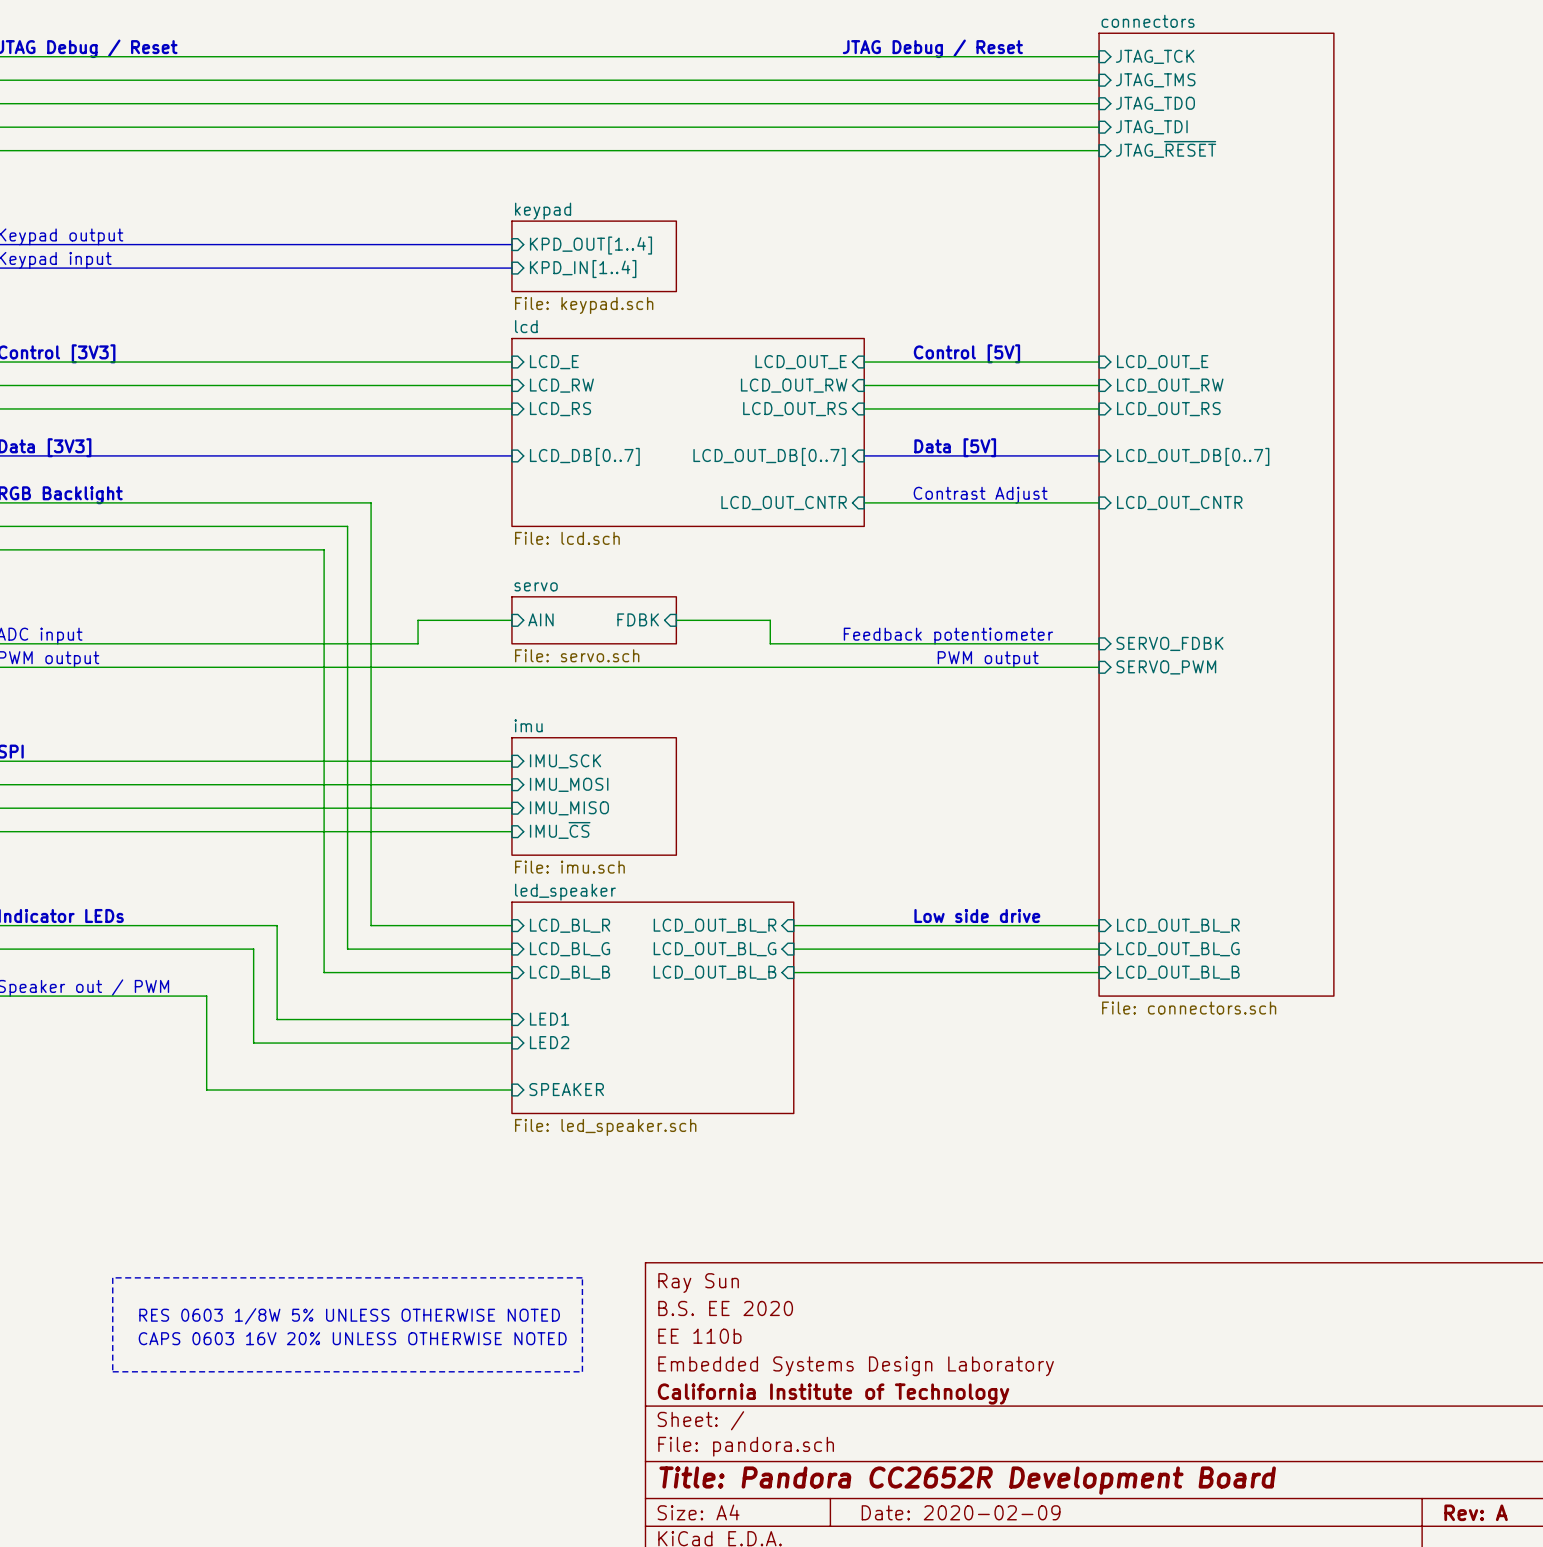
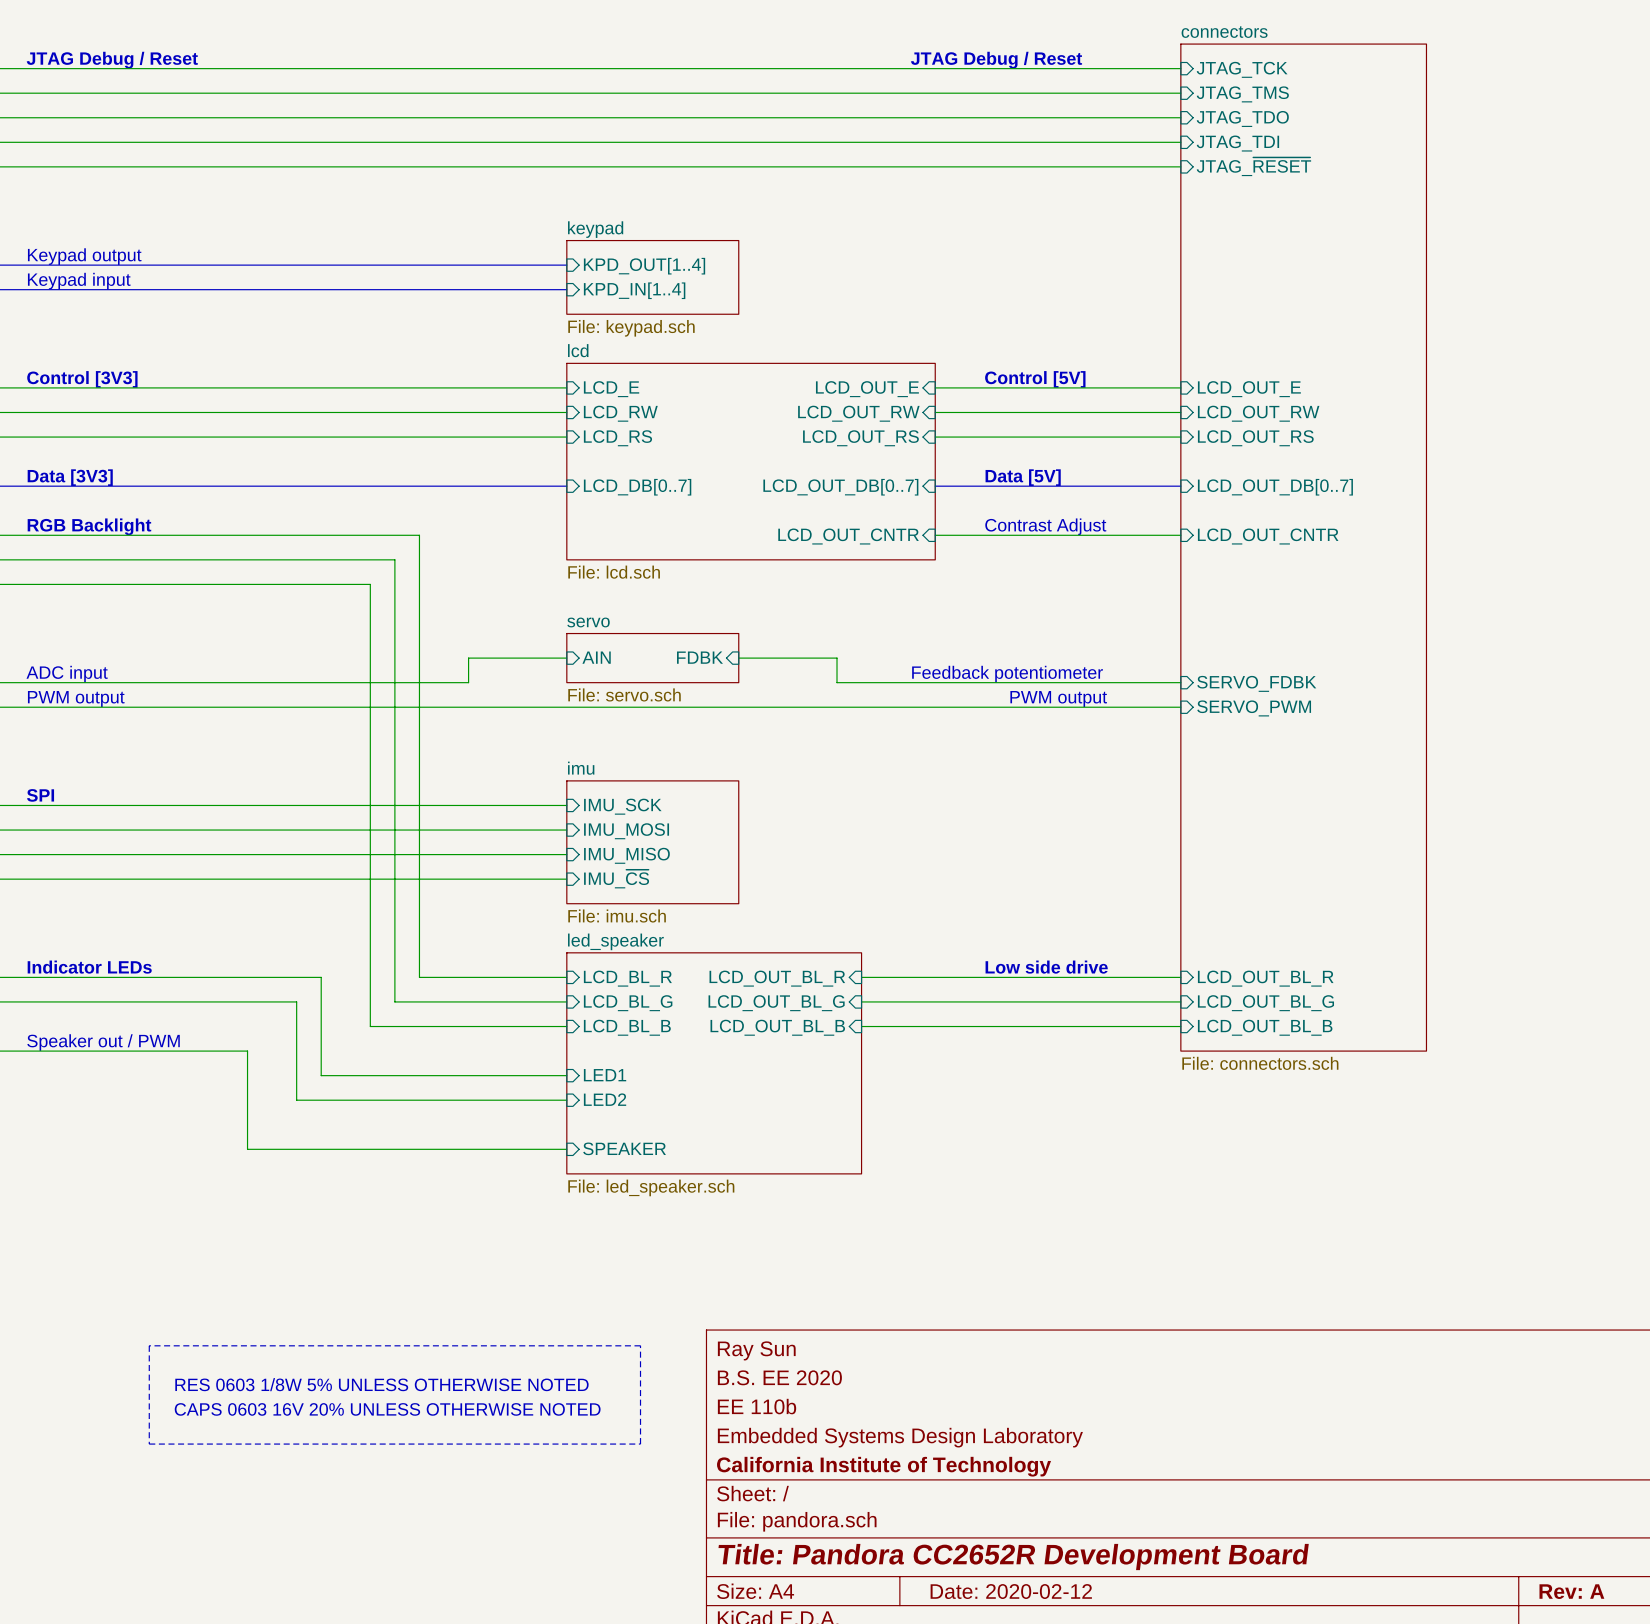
title block: Date: 2020-02-09 (961, 1512) -> Date: 2020-02-12 (1011, 1591)

